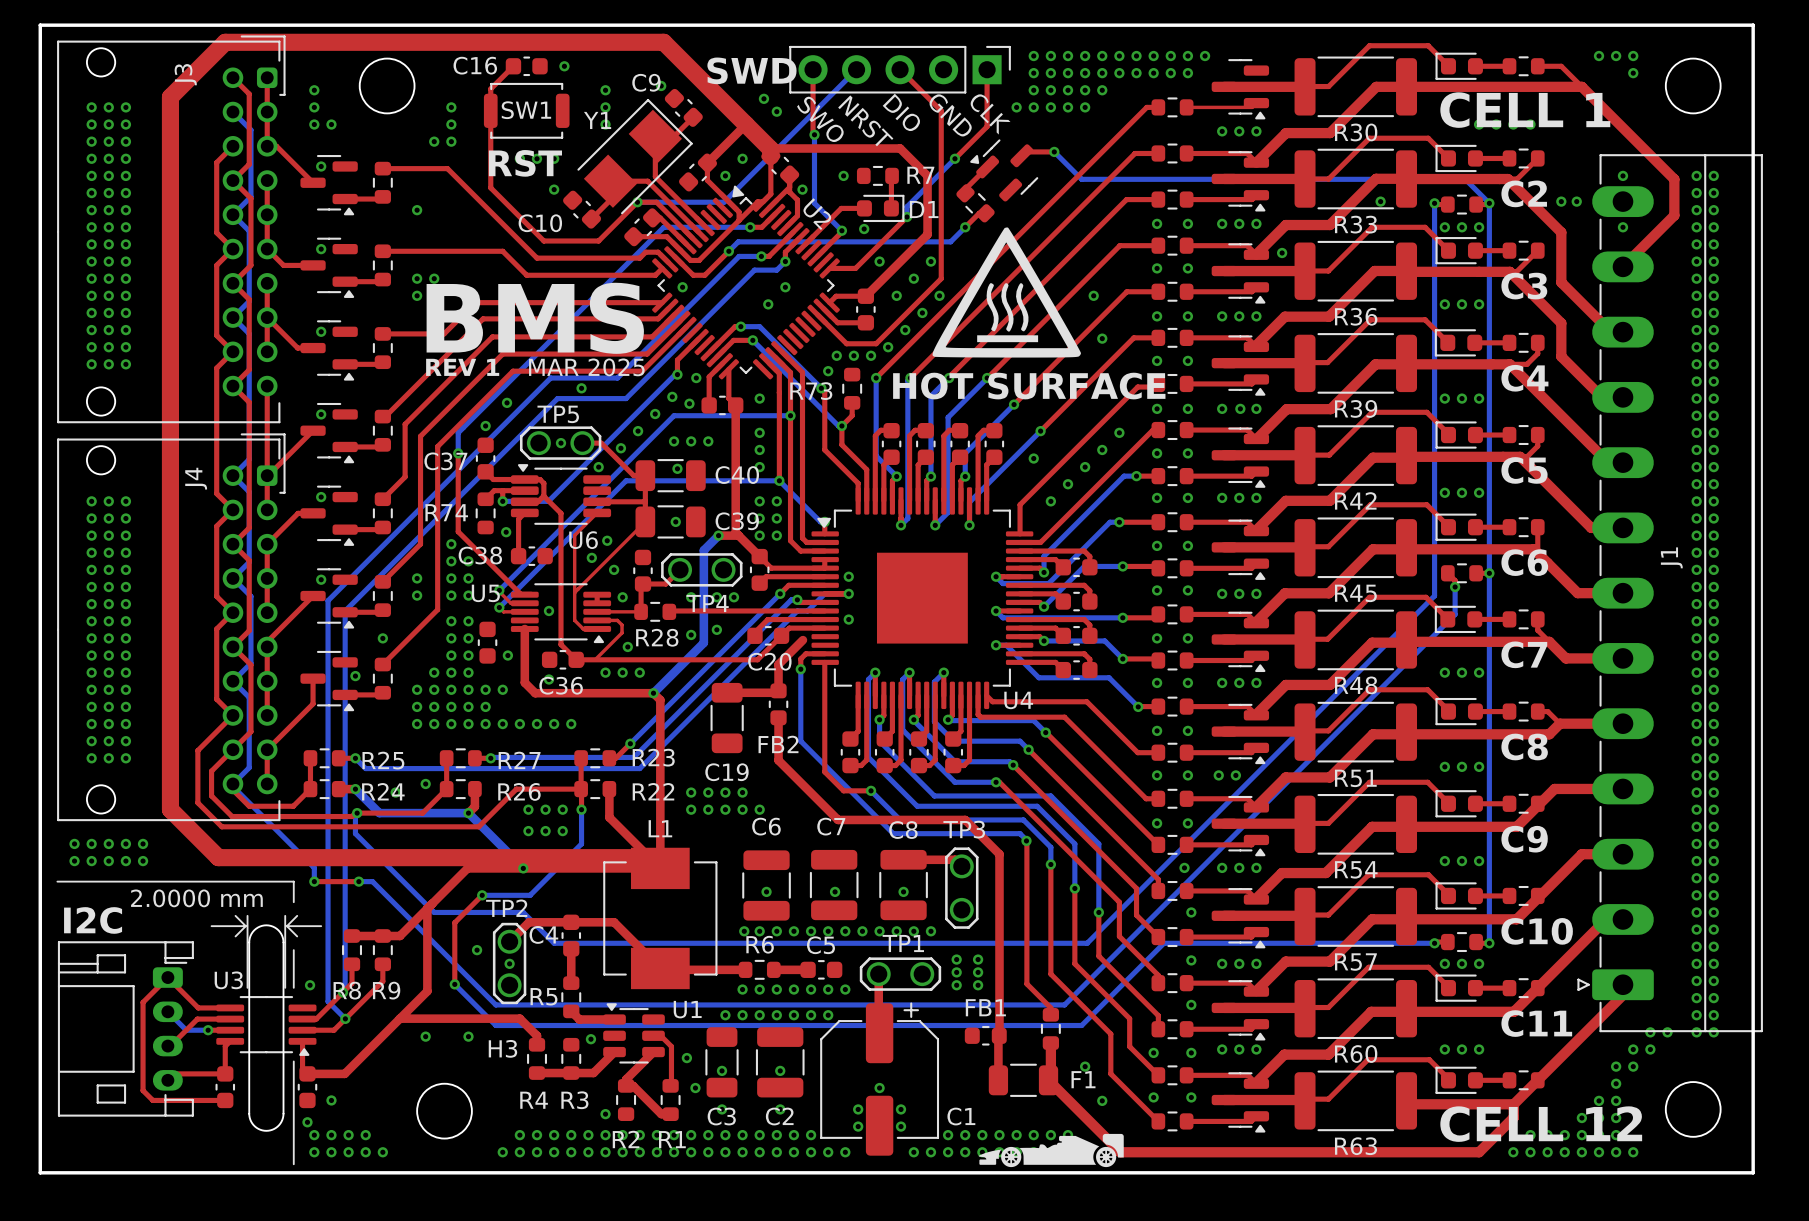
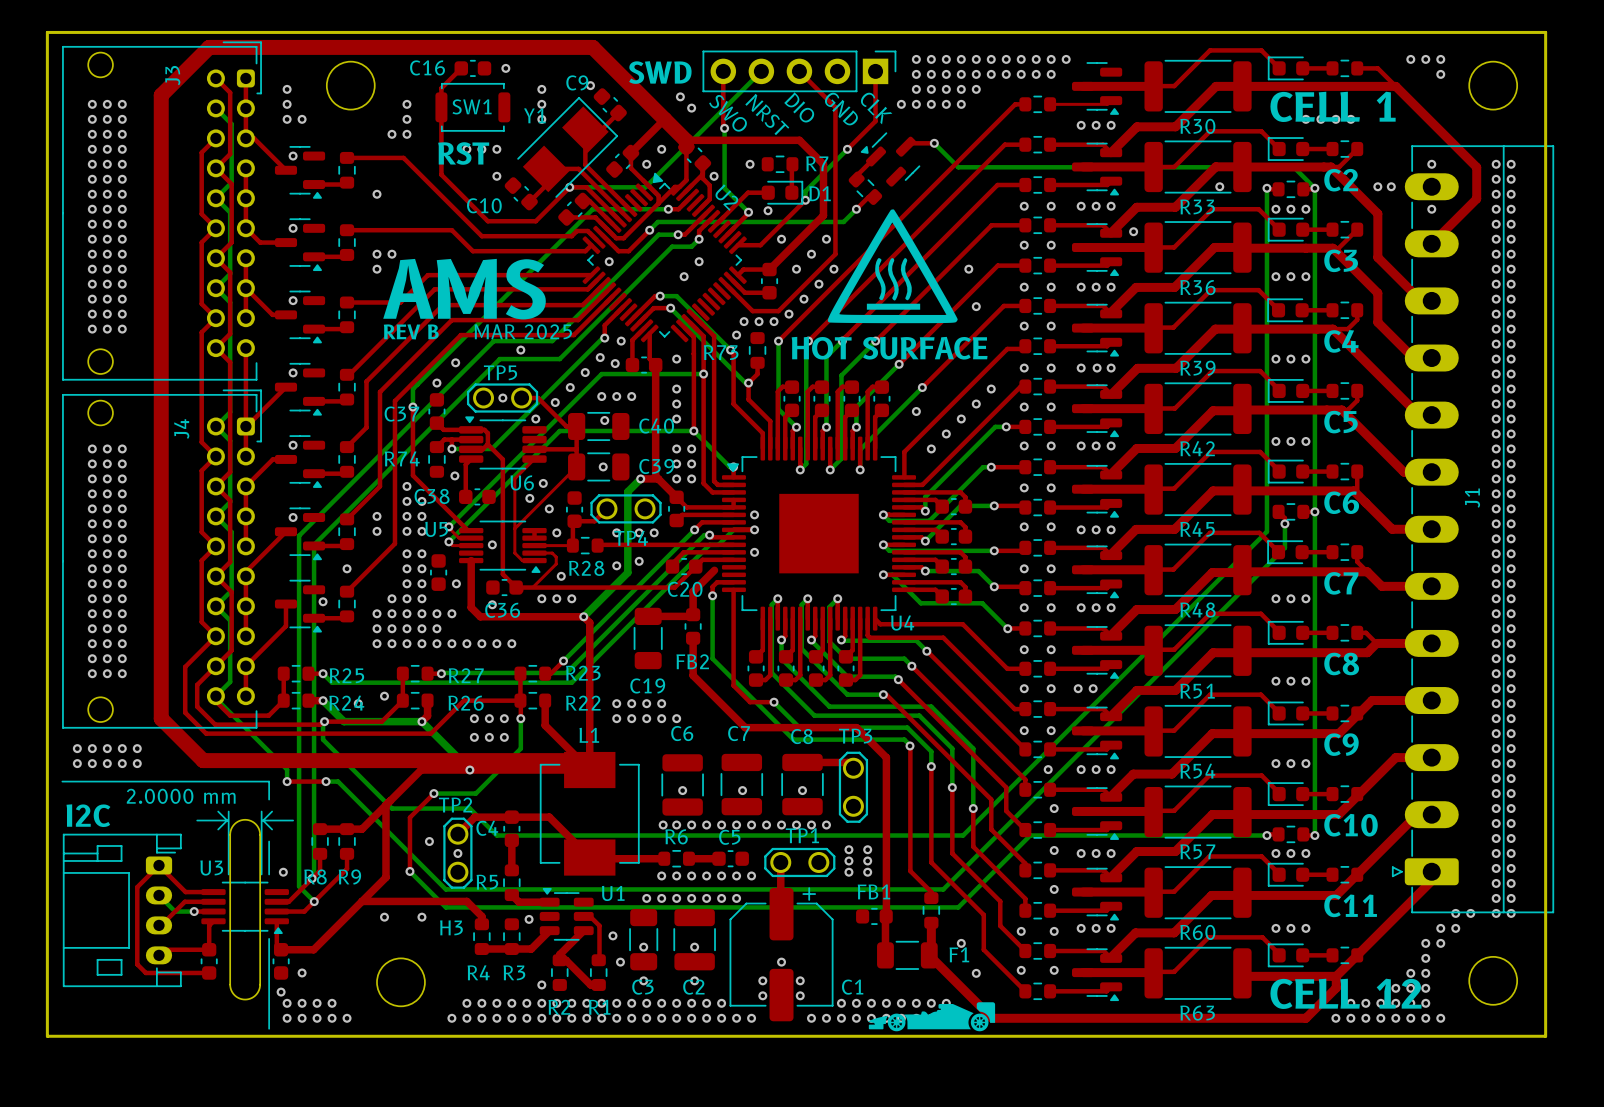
text: BMS (535, 318) -> AMS (464, 289)
text: REV 1 (462, 367) -> REV B (411, 331)

